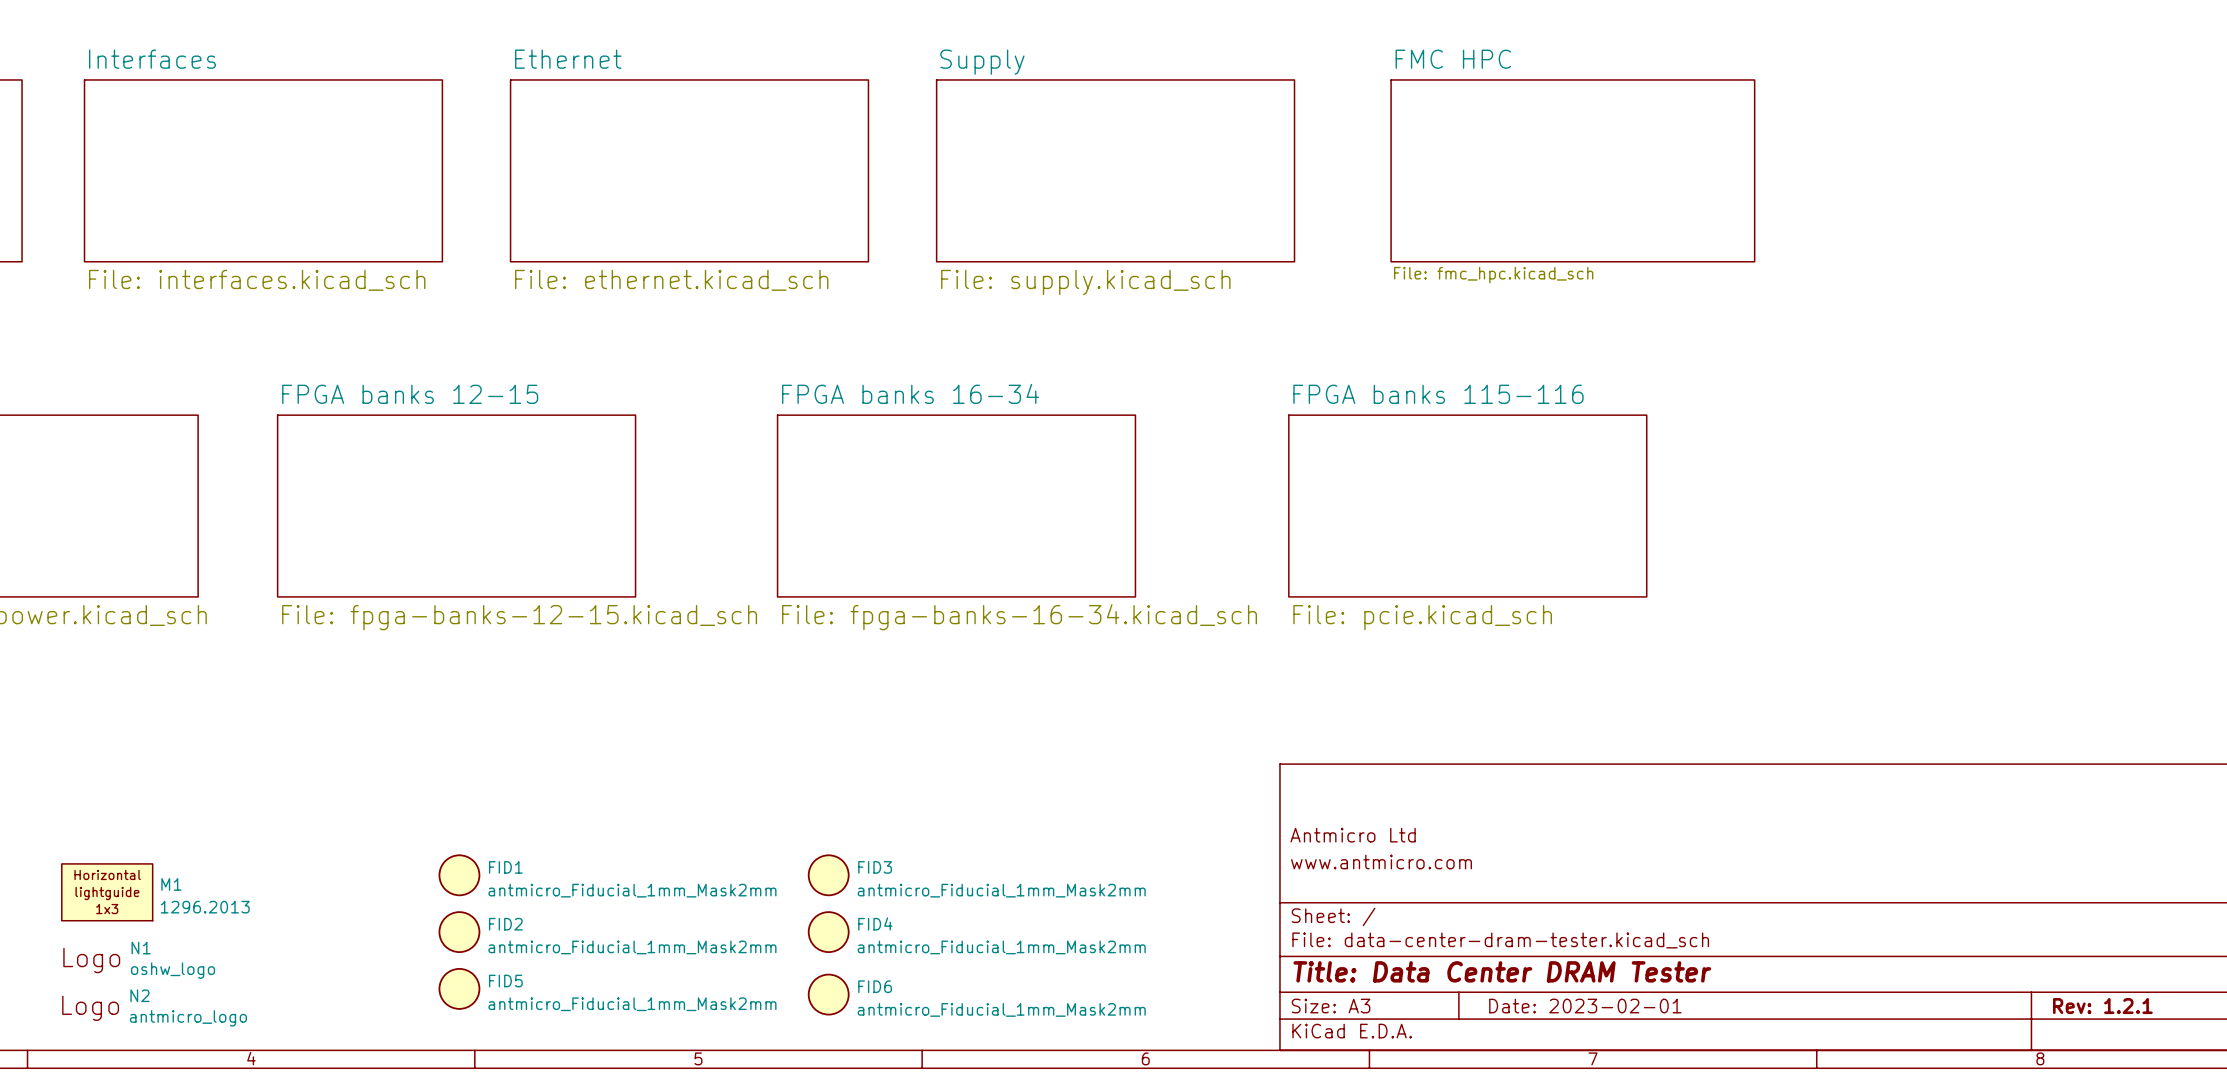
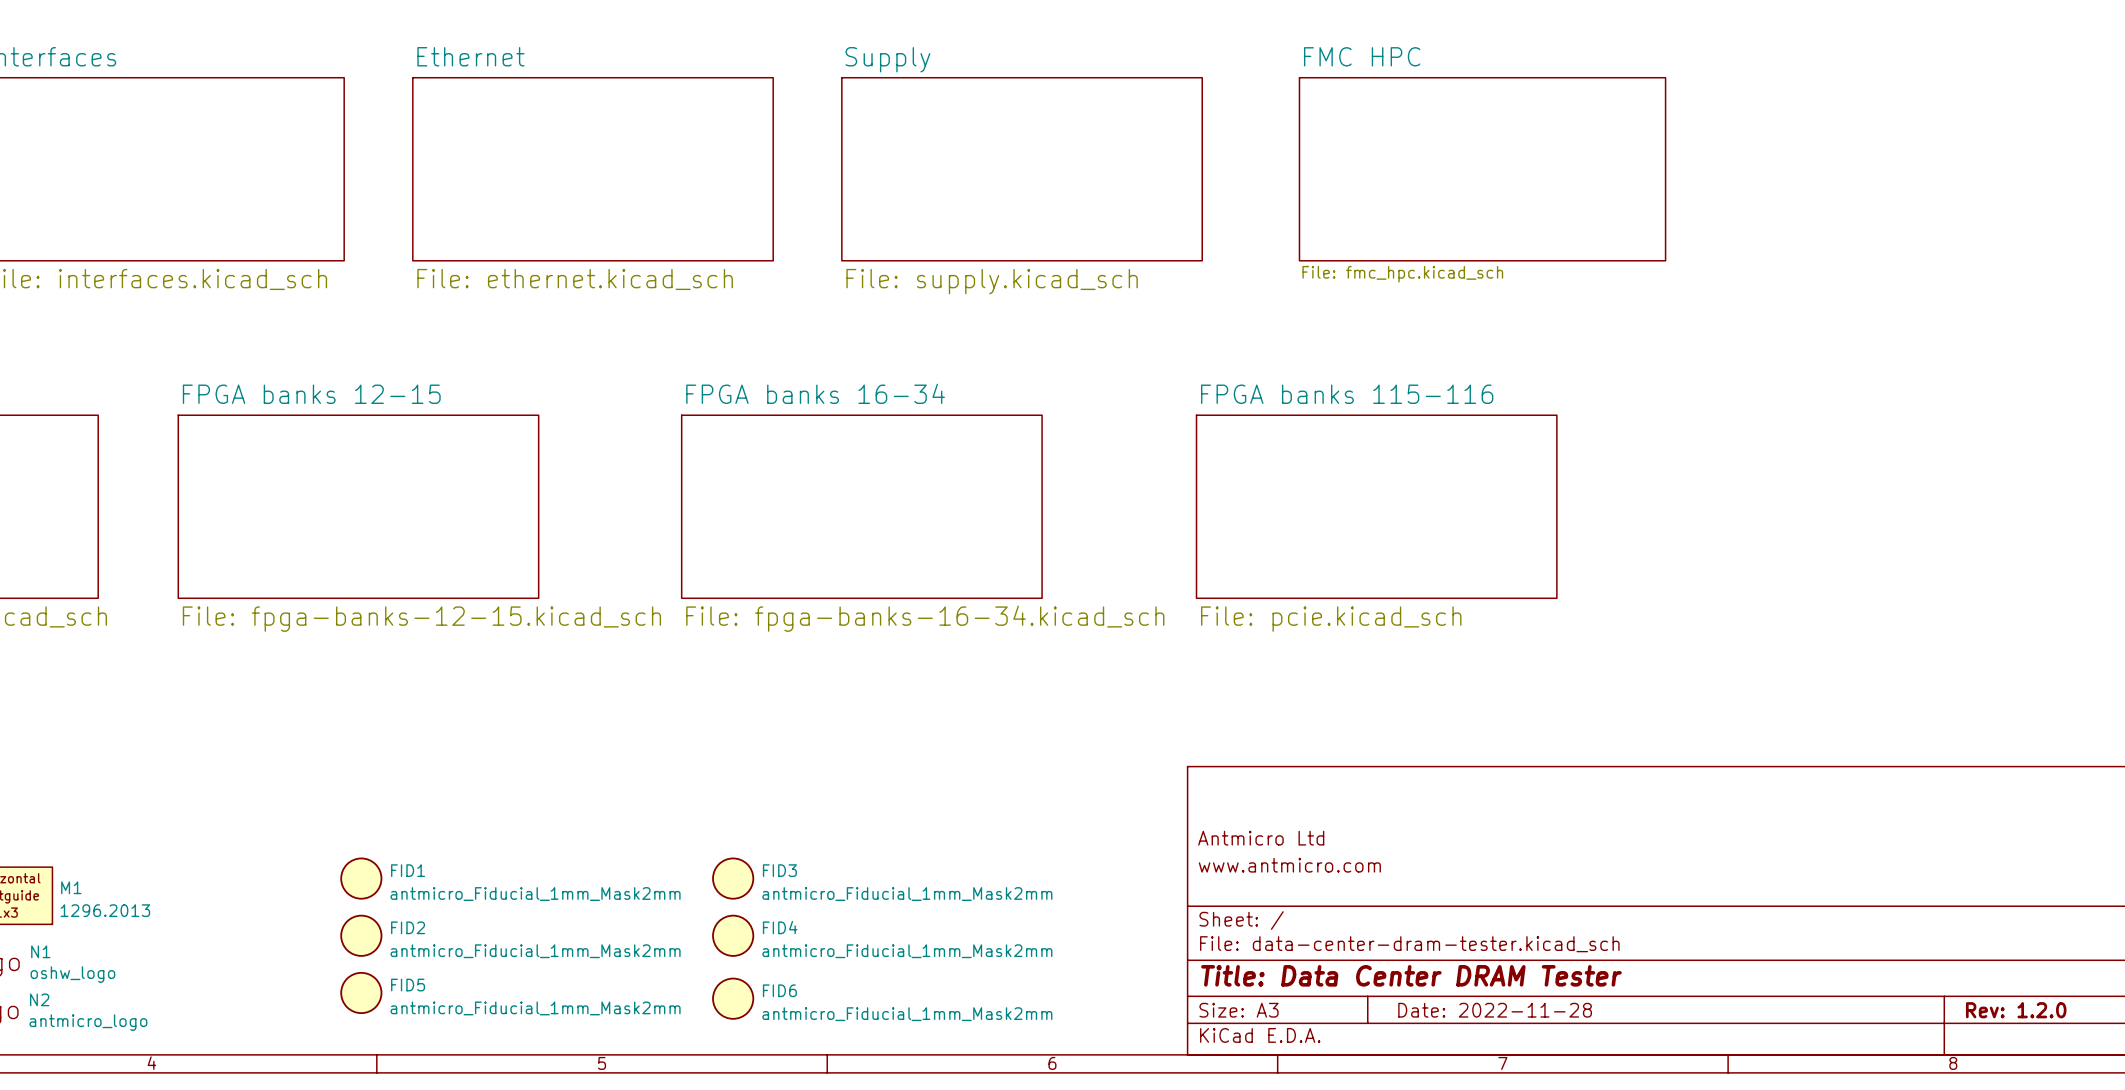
title block: Date: 2023-02-01 (1585, 1006) -> Date: 2022-11-28 (1495, 1010)
title block: Rev: 1.2.1 (2102, 1006) -> Rev: 1.2.0 (2016, 1010)

